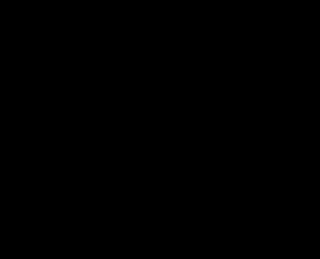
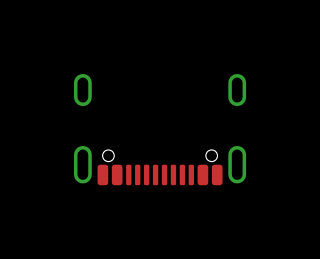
part: none -> (160, 129)

